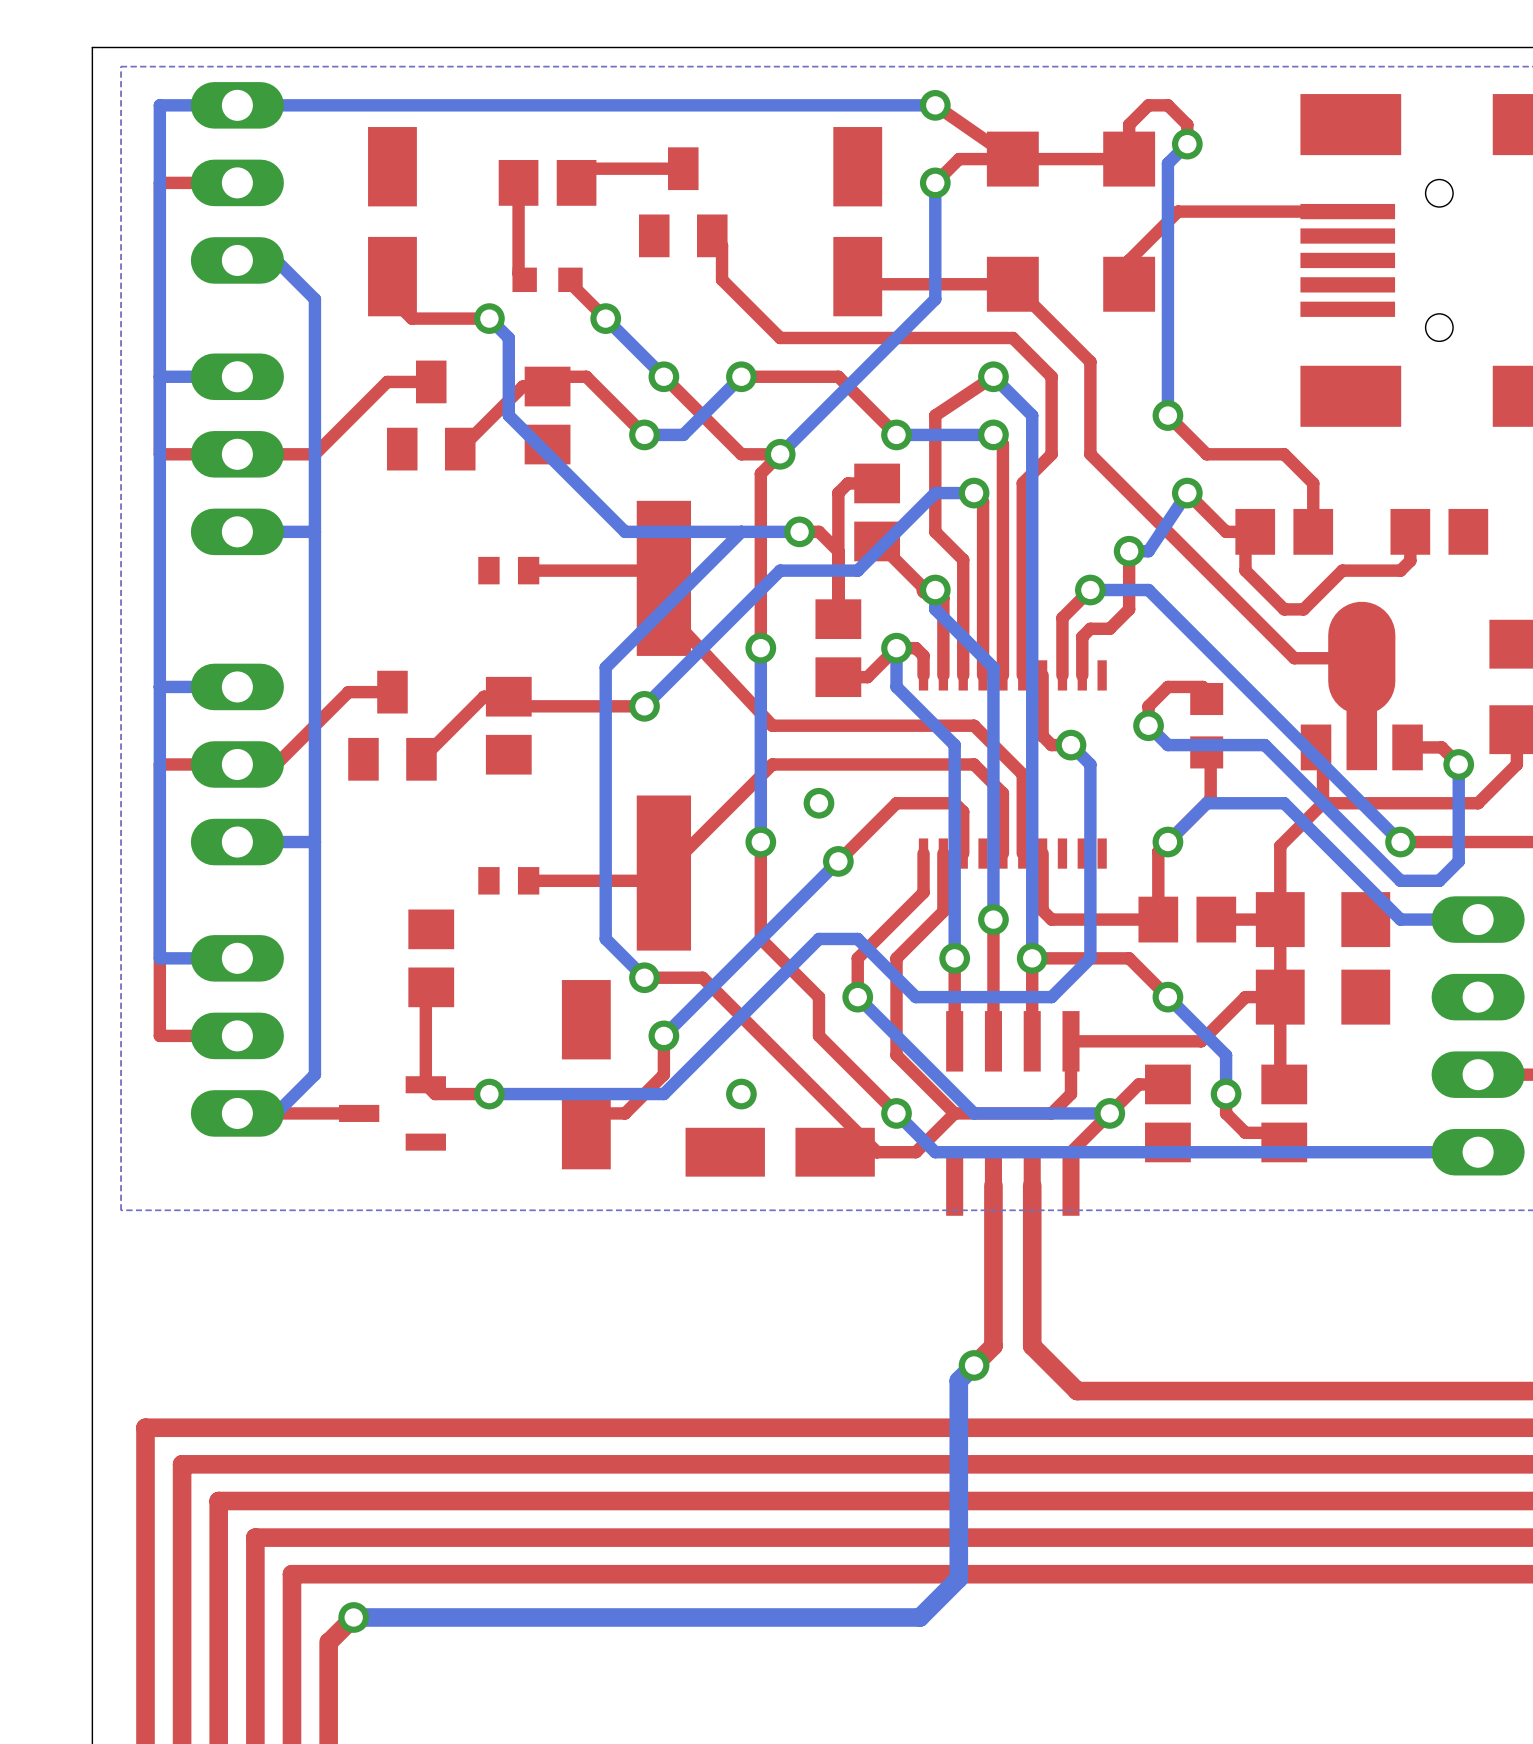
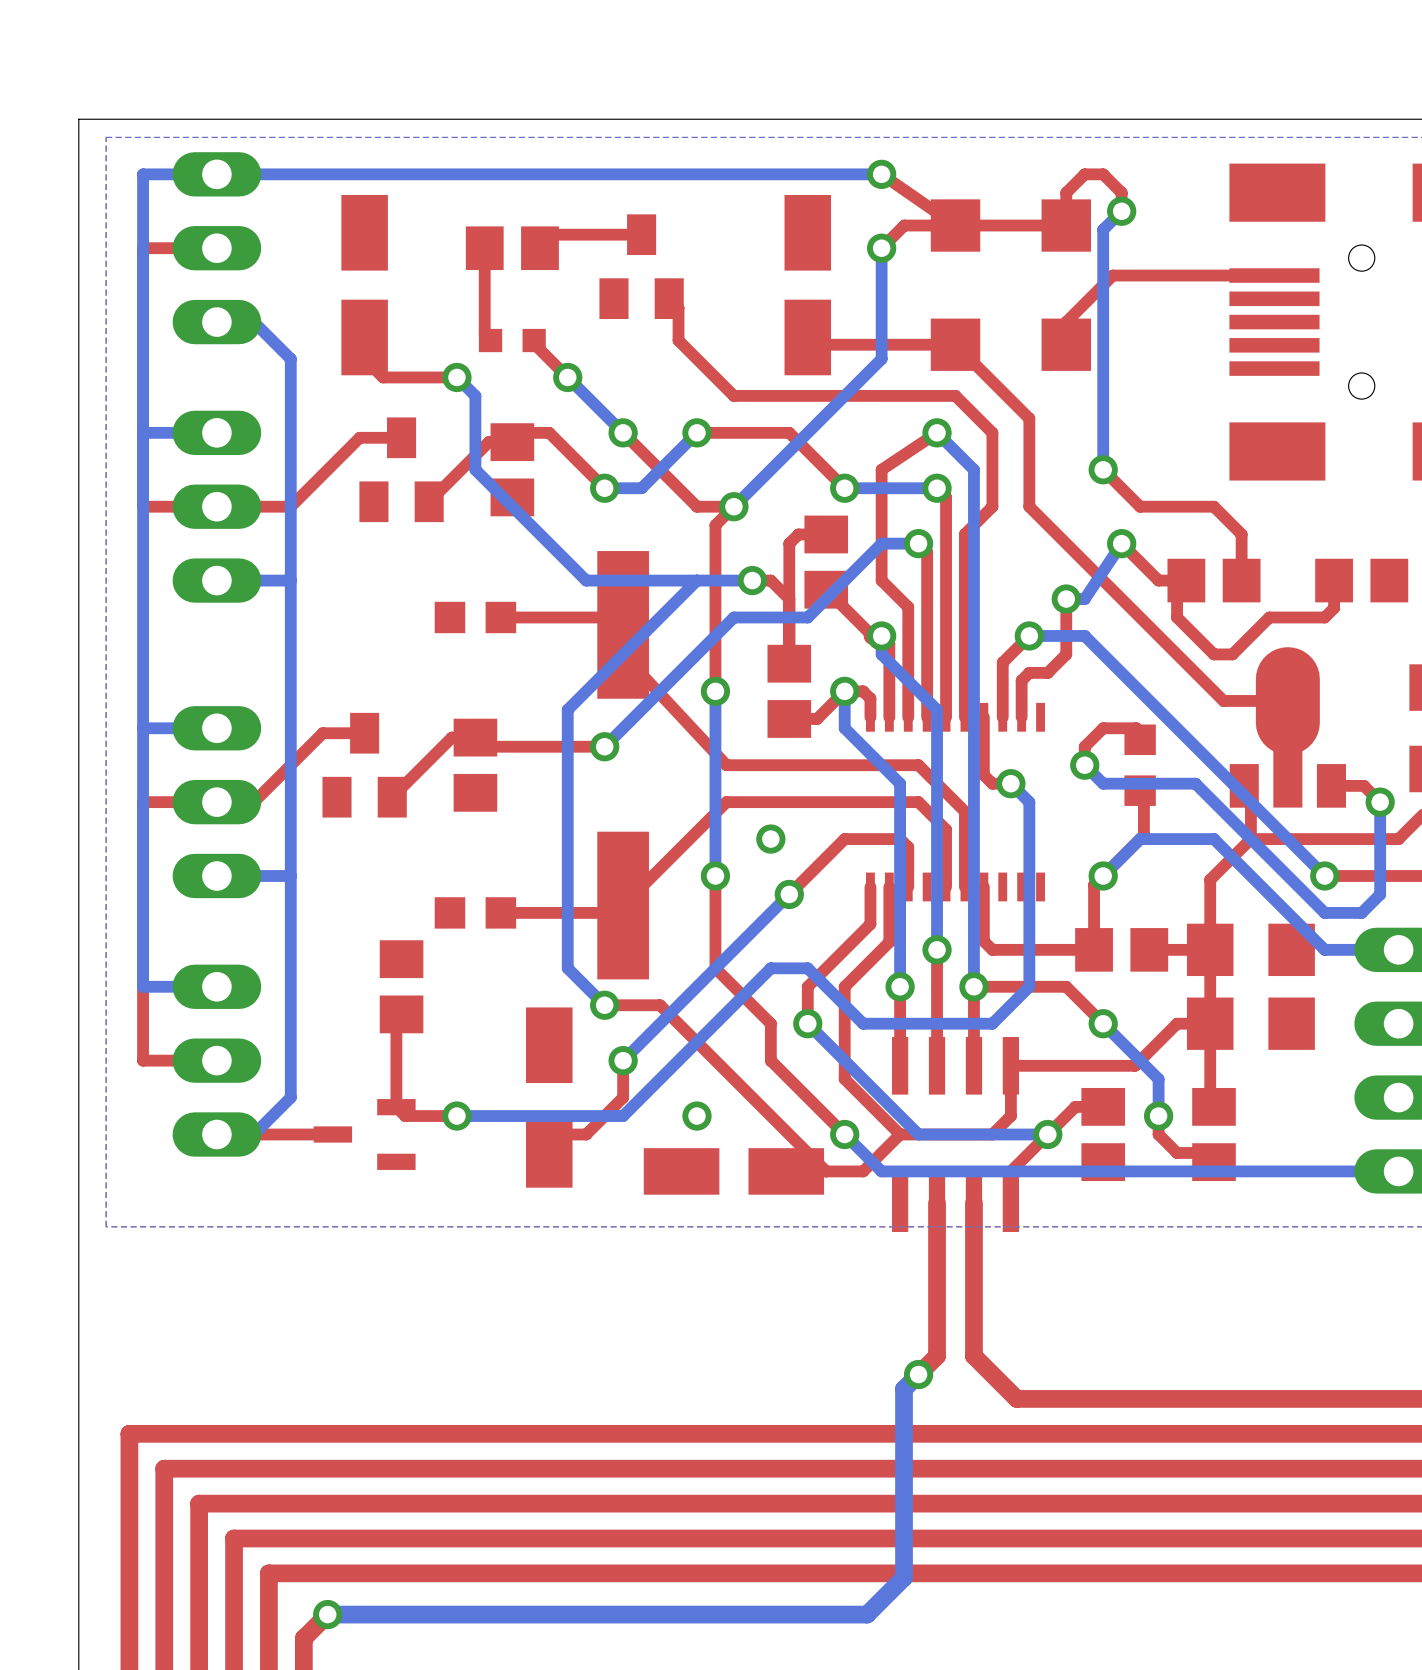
part footprint: [478, 556, 540, 585] -> [434, 601, 517, 634]
part footprint: [478, 867, 540, 895] -> [434, 897, 517, 929]

